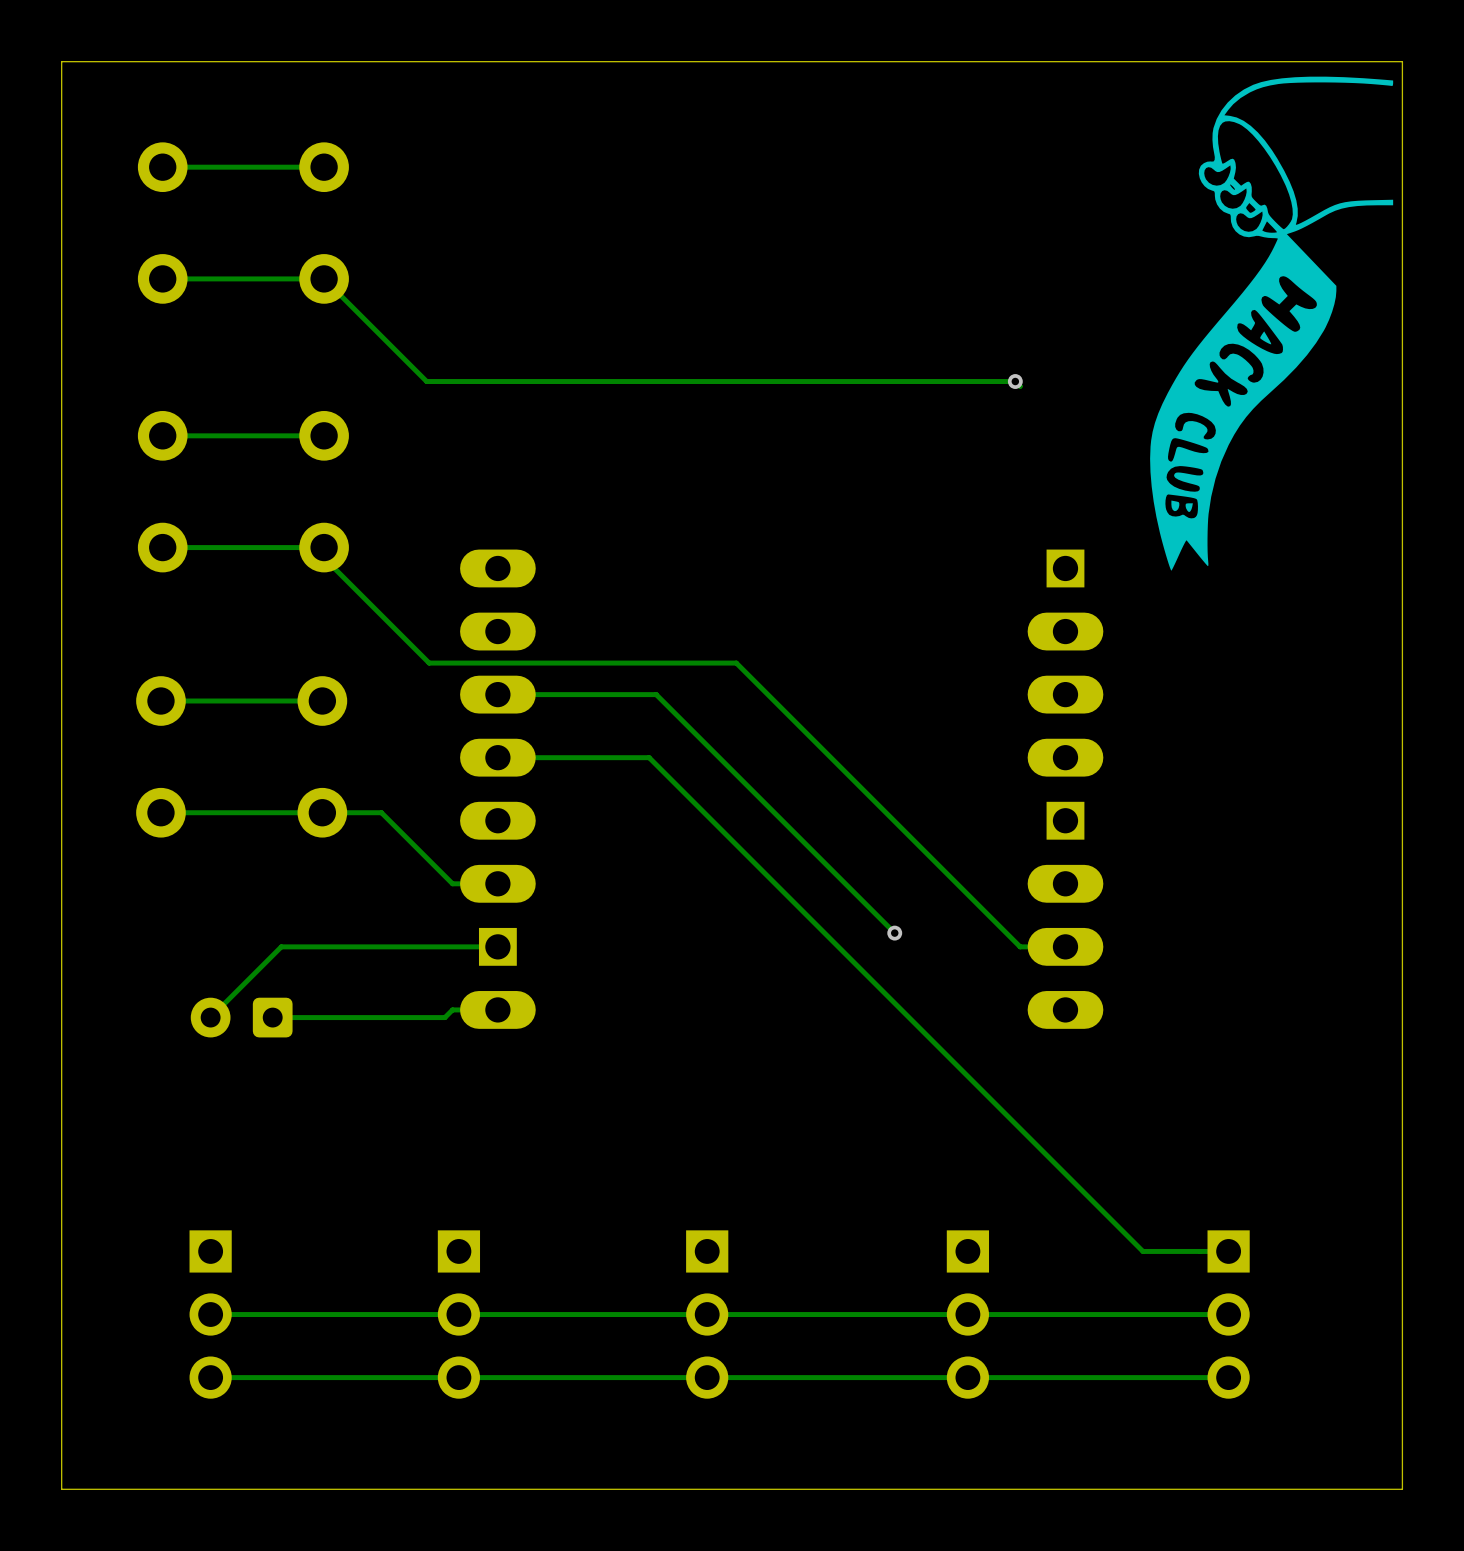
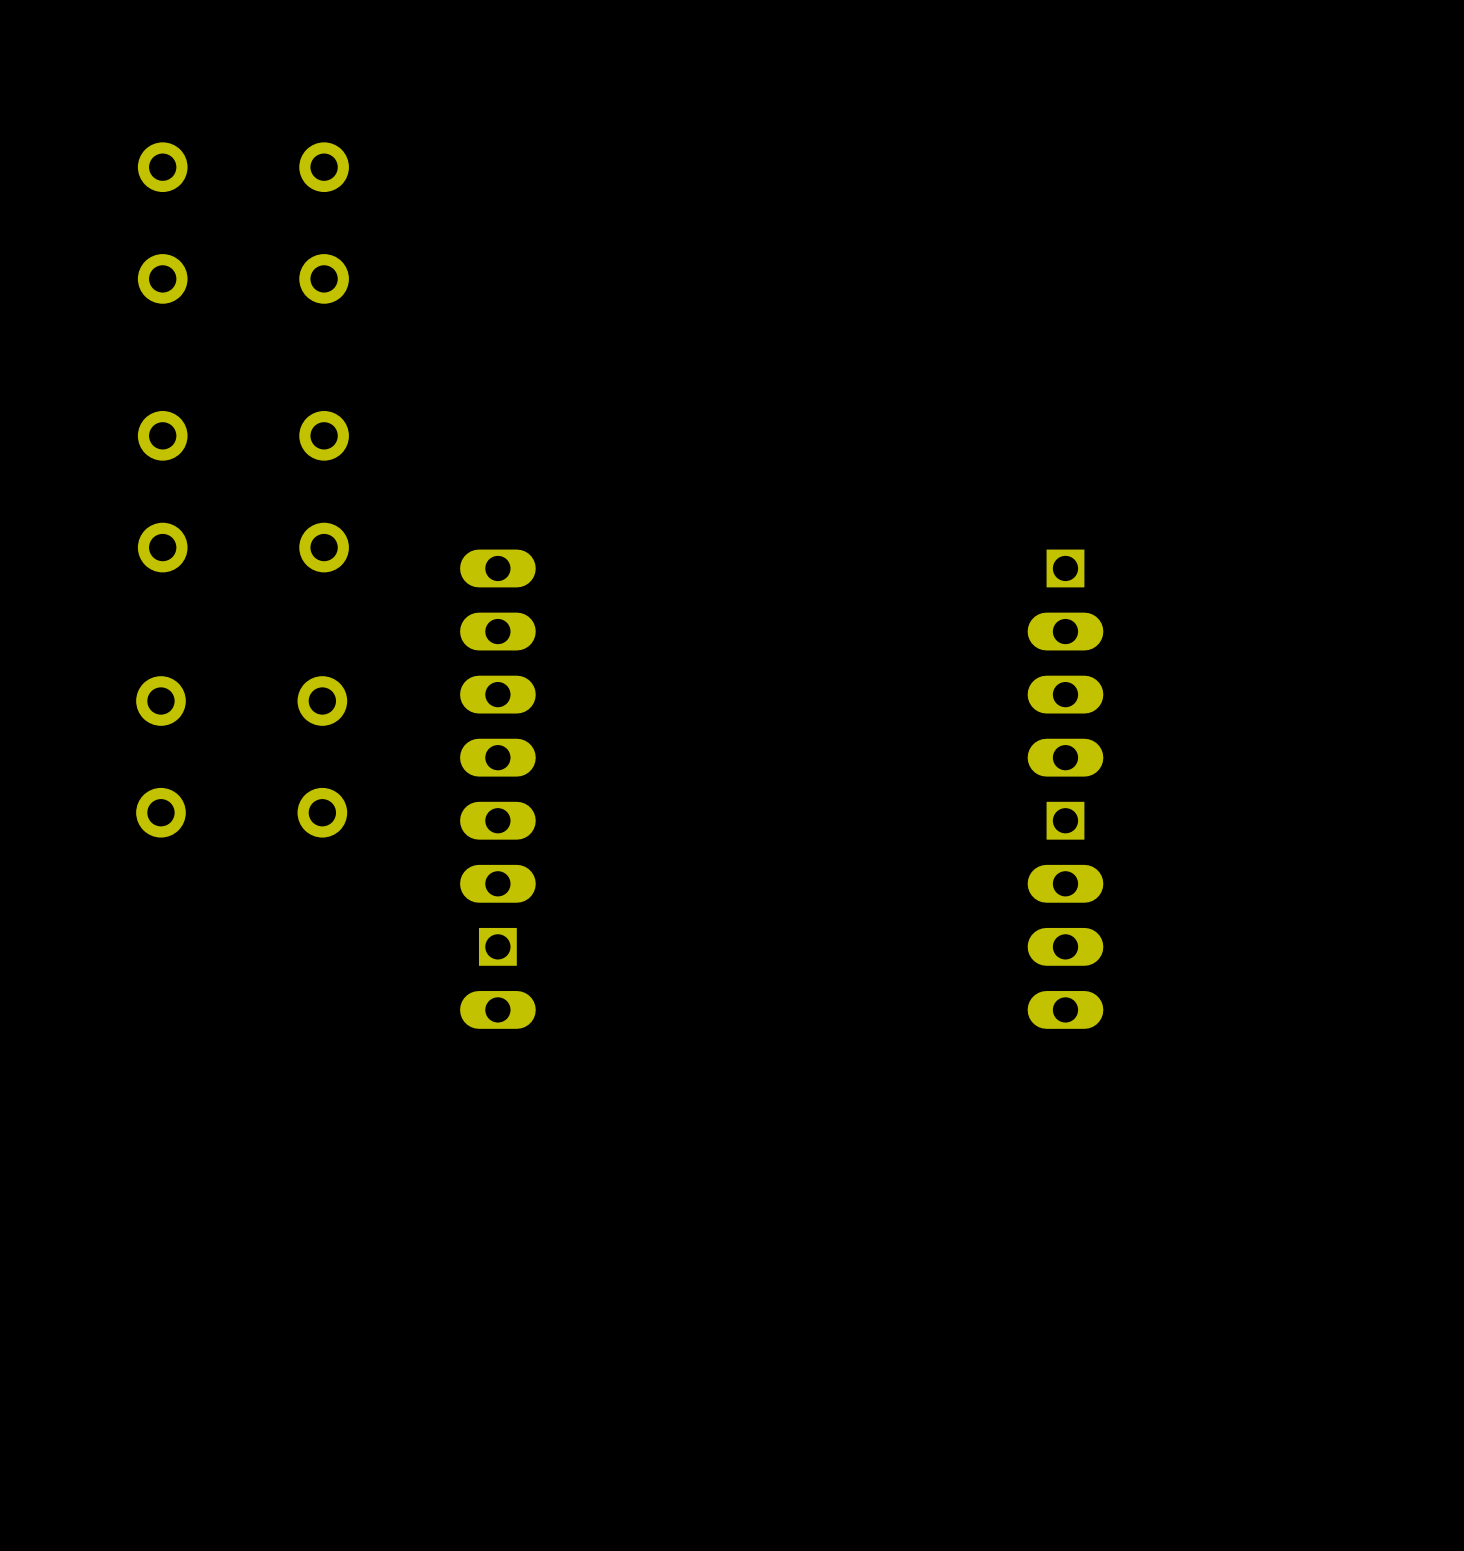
board edge: (1402, 61) (61, 61) (61, 1489) (1402, 1489) (1402, 61) -> none
drawing: [1150, 76, 1394, 571] -> none
track: (324, 167) (162, 167) -> none
track: (162, 278) (324, 278) (426, 381) (1015, 381) (1020, 386) -> none
via: (1015, 381) -> none
track: (324, 435) (162, 435) -> none
track: (162, 547) (324, 547) (324, 557) (429, 663) (736, 663) (1020, 946) (1065, 946) -> none
track: (497, 694) (656, 694) (894, 932) -> none
track: (322, 701) (160, 701) -> none
track: (497, 757) (649, 757) (1142, 1251) (1228, 1251) -> none
track: (160, 812) (381, 812) (452, 883) (497, 883) -> none
via: (894, 933) -> none
track: (497, 946) (281, 946) (210, 1017) -> none
track: (497, 1009) (452, 1009) (444, 1017) (272, 1017) -> none
part: (241, 1017) -> none
part: (210, 1314) -> none
part: (458, 1314) -> none
part: (707, 1314) -> none
part: (967, 1314) -> none
track: (1228, 1314) (210, 1314) -> none
part: (1228, 1314) -> none
track: (1228, 1377) (210, 1377) -> none

